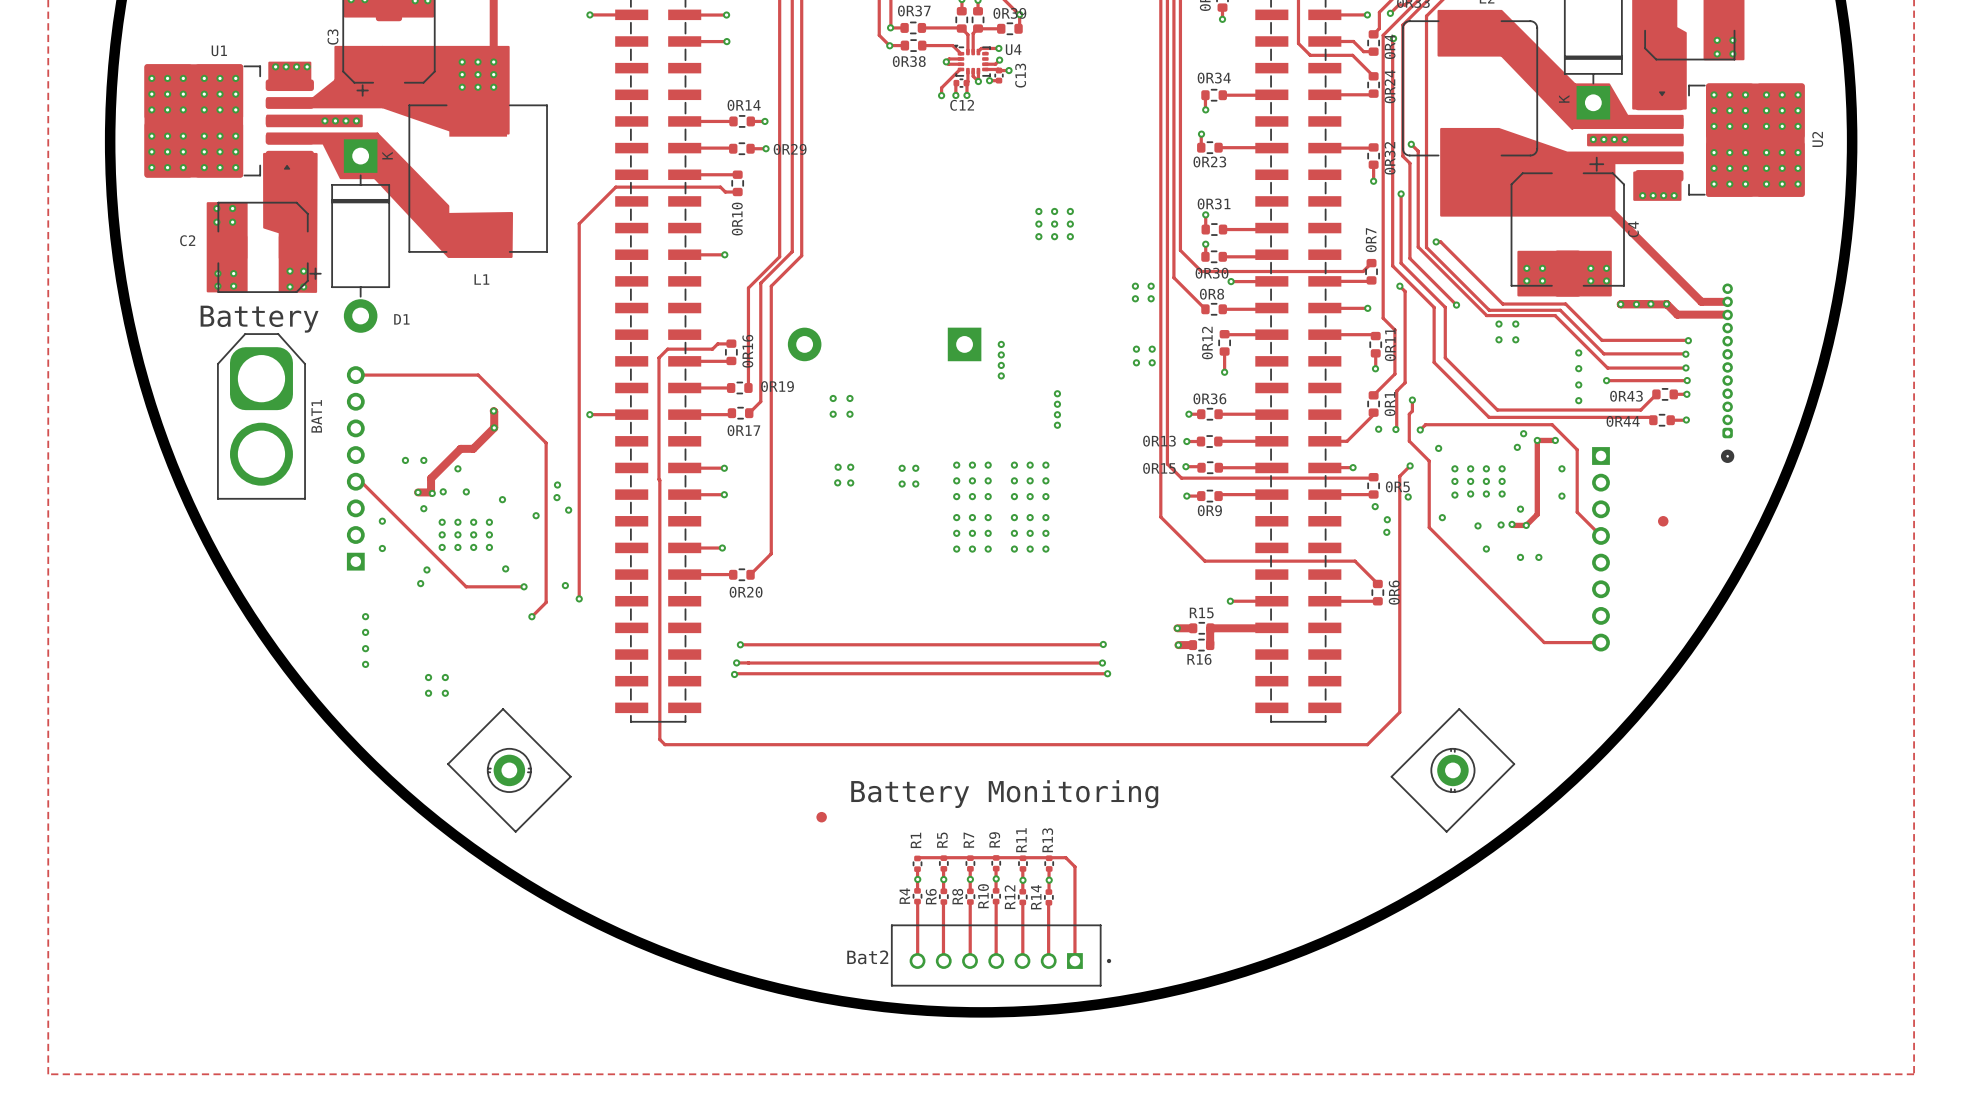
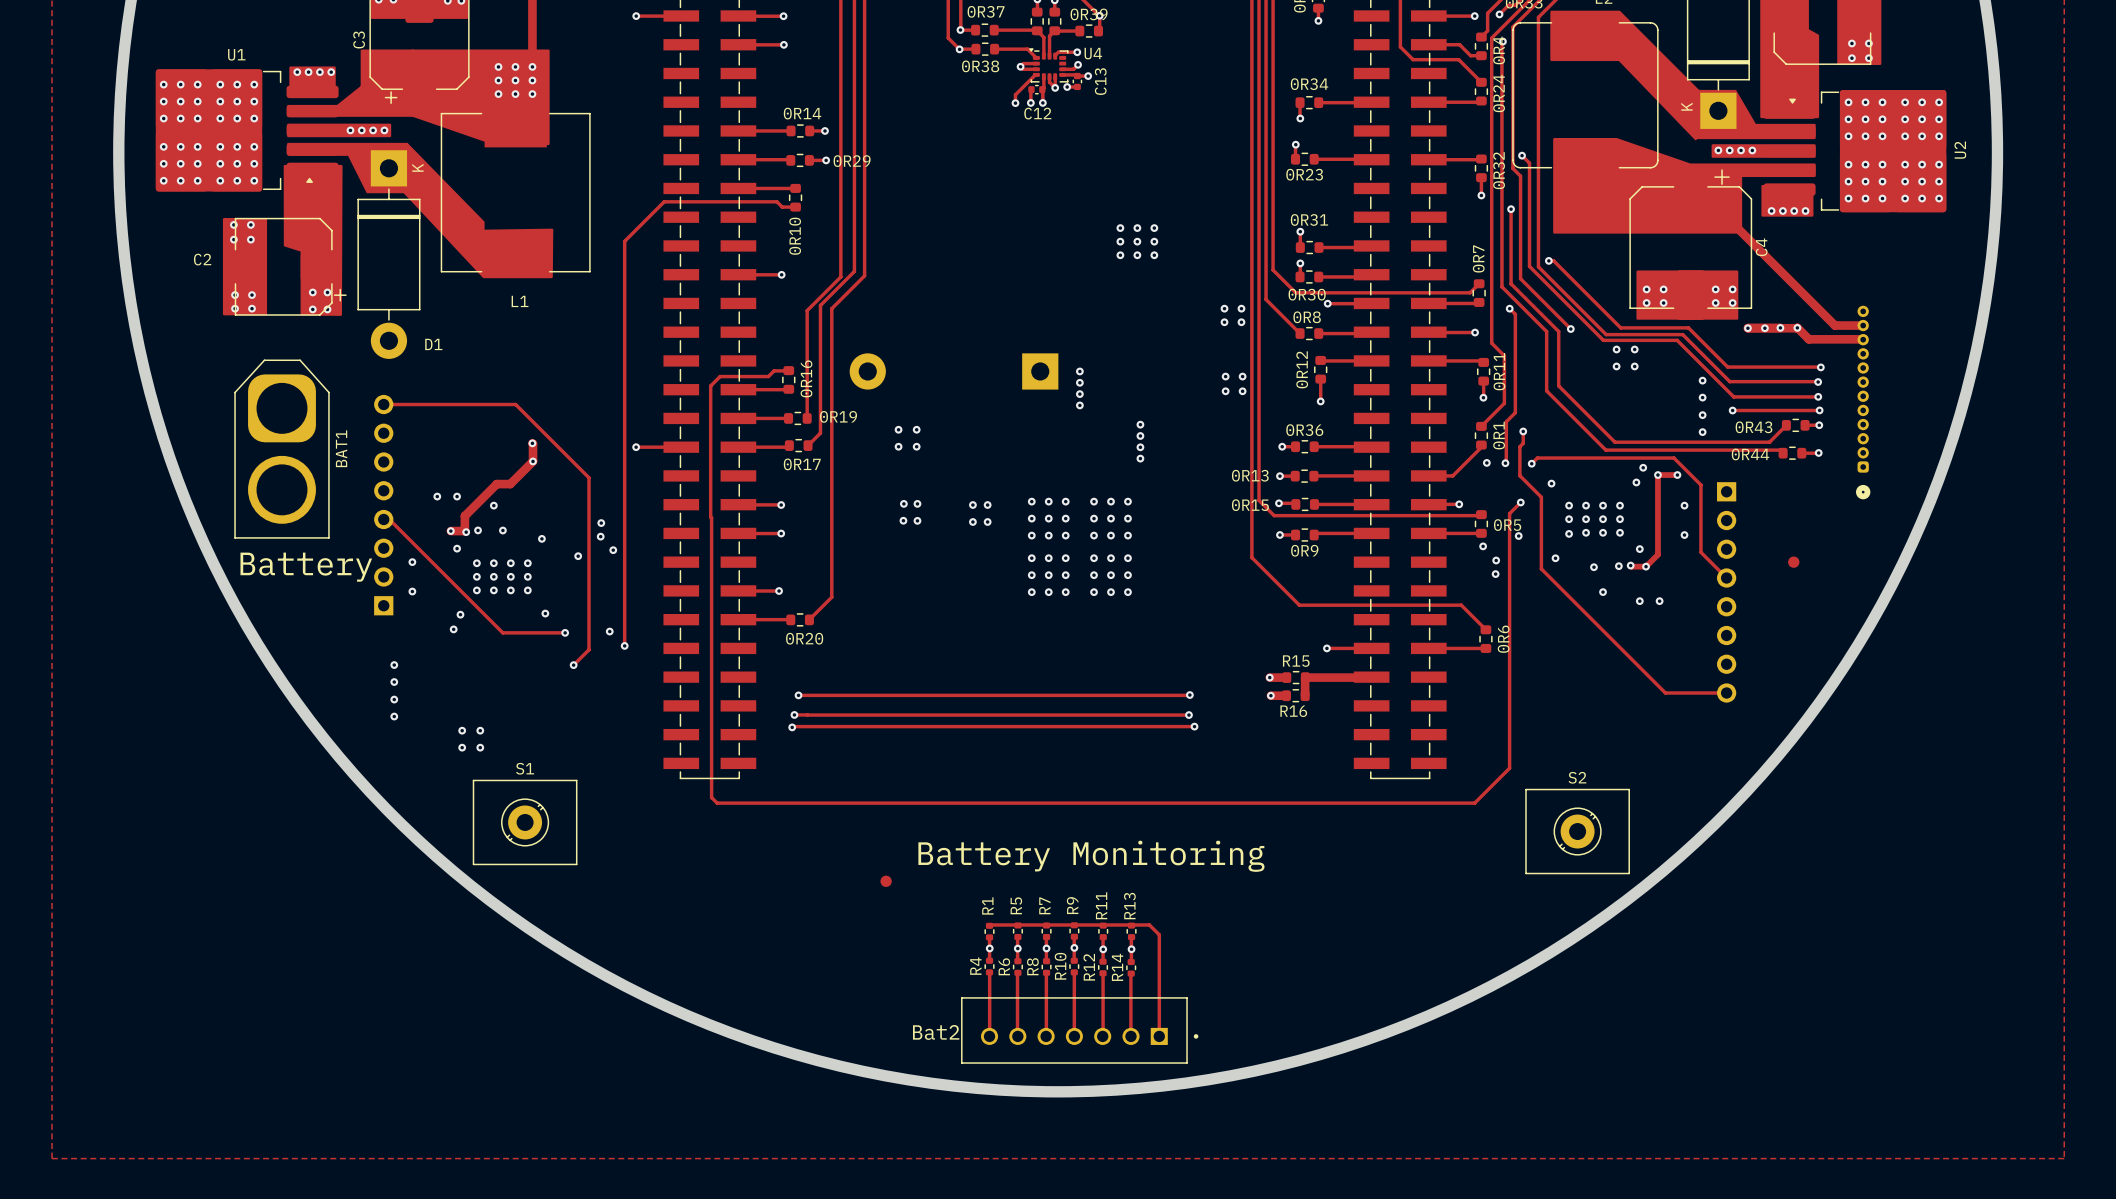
text position: Battery (259, 319) -> Battery (306, 567)
S1: none -> (525, 822)
part: (509, 770) -> none
part: (1452, 770) -> none
S2: none -> (1577, 831)

